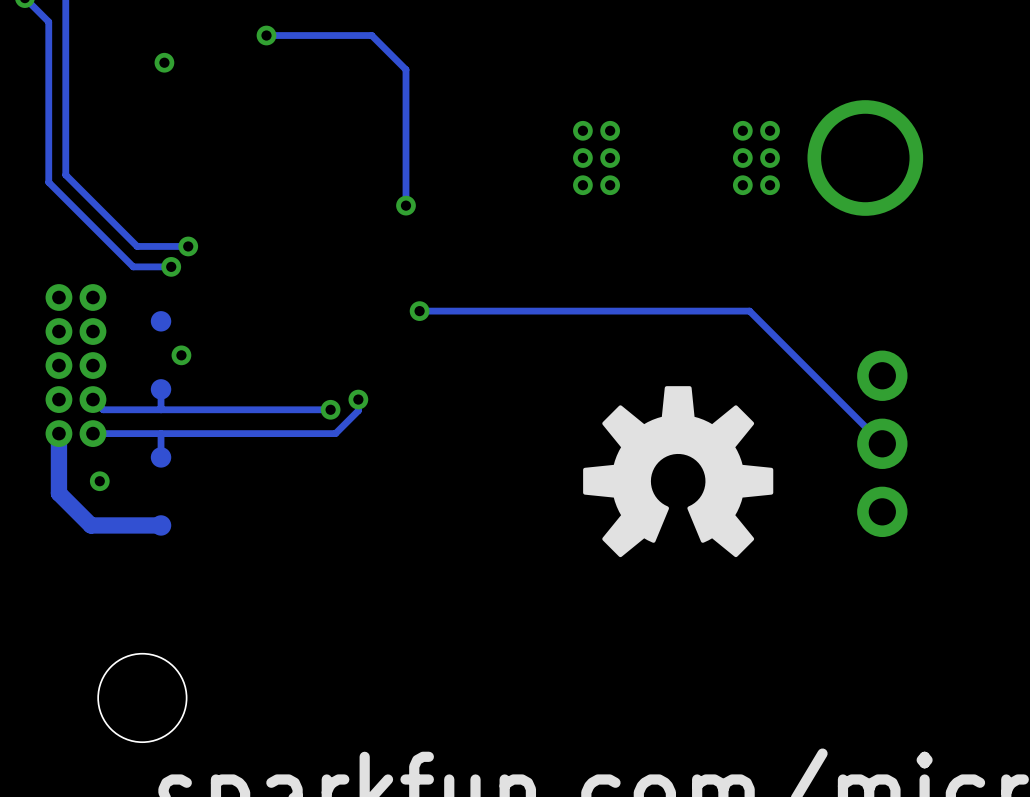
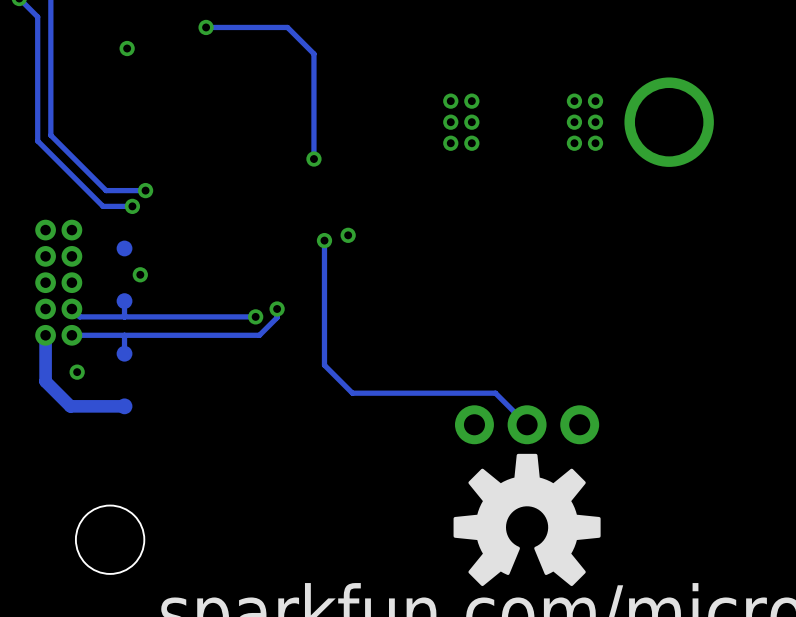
via: none -> (348, 235)
track: (419, 311) (749, 311) (882, 443) -> (324, 240) (324, 365) (352, 393) (495, 393) (527, 424)
part rotation: 0° (882, 443) -> 90° clockwise (527, 424)
part position: (882, 443) -> (527, 424)
drawing position: (678, 471) -> (527, 519)

